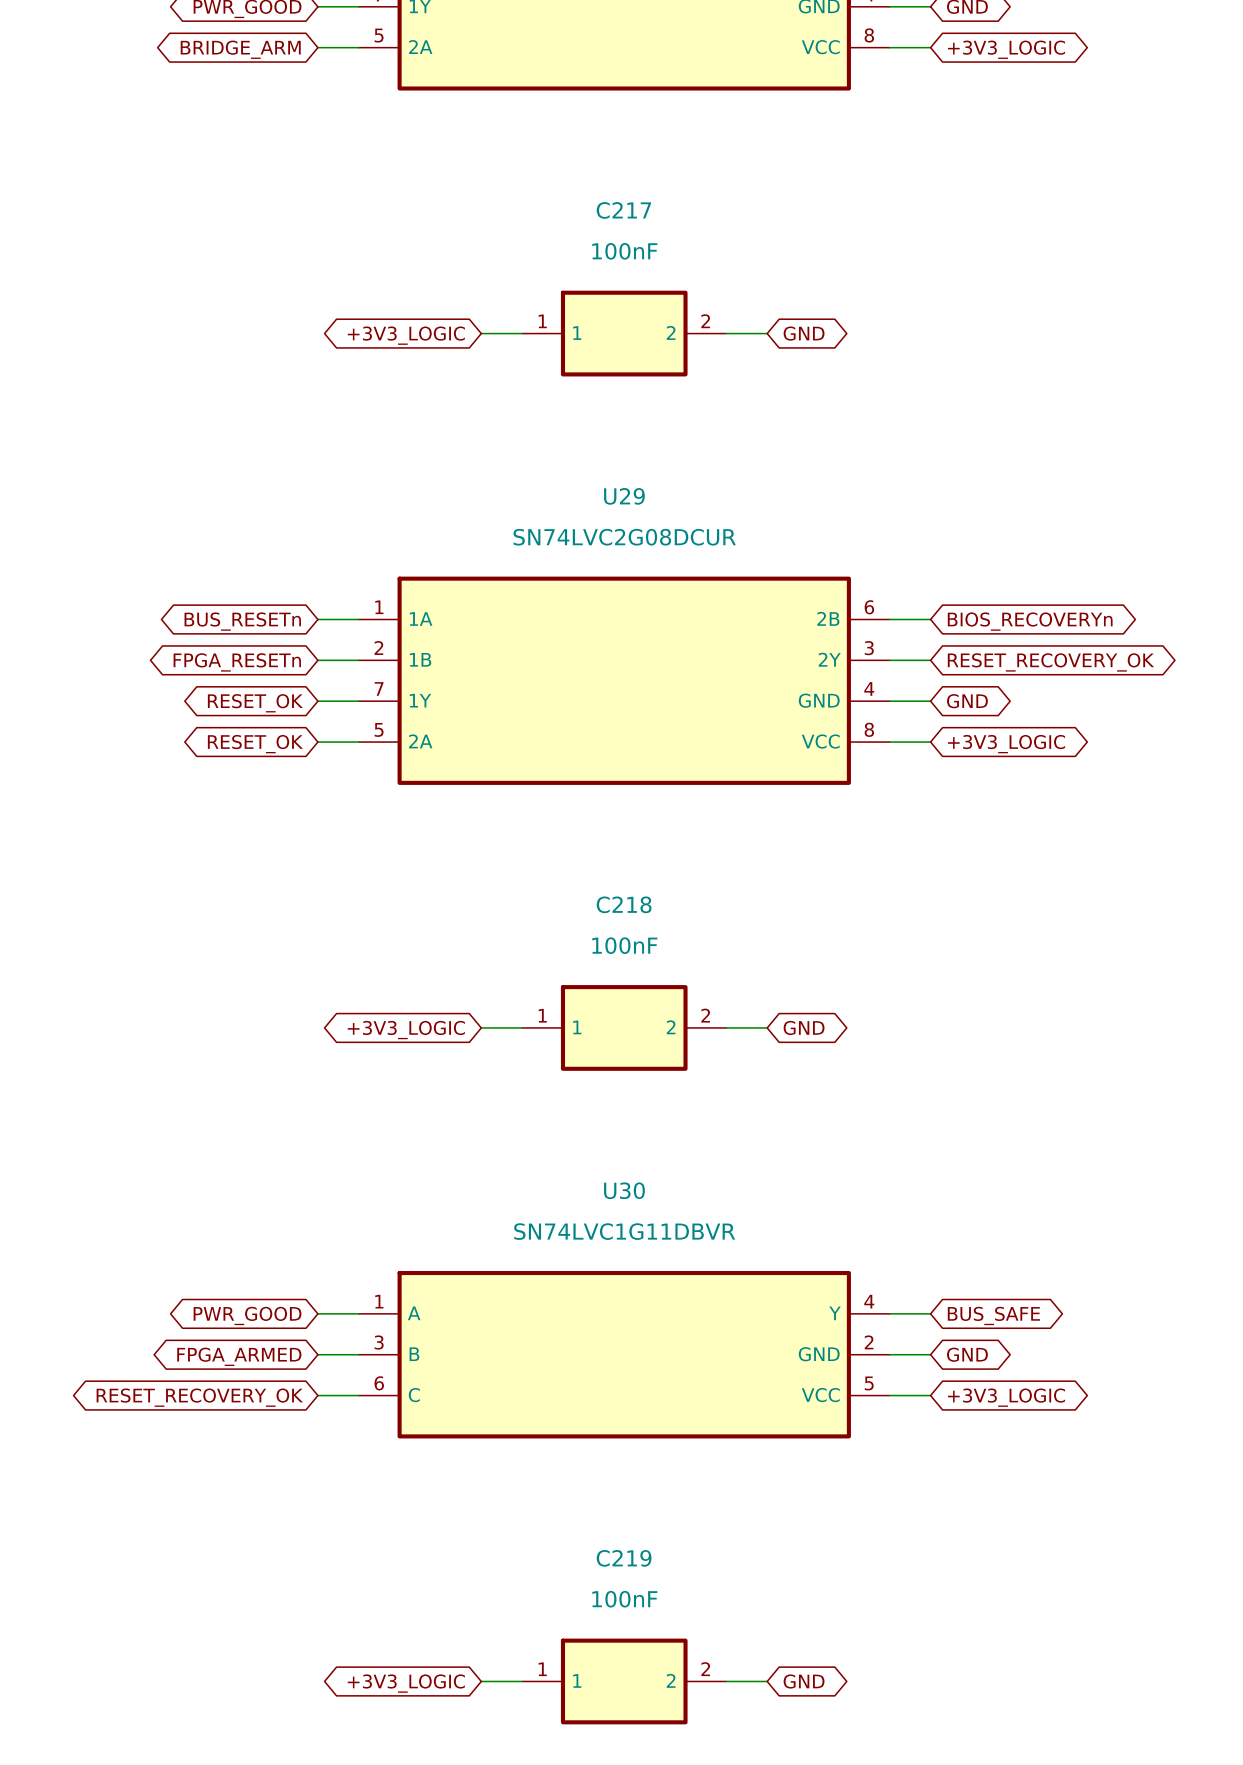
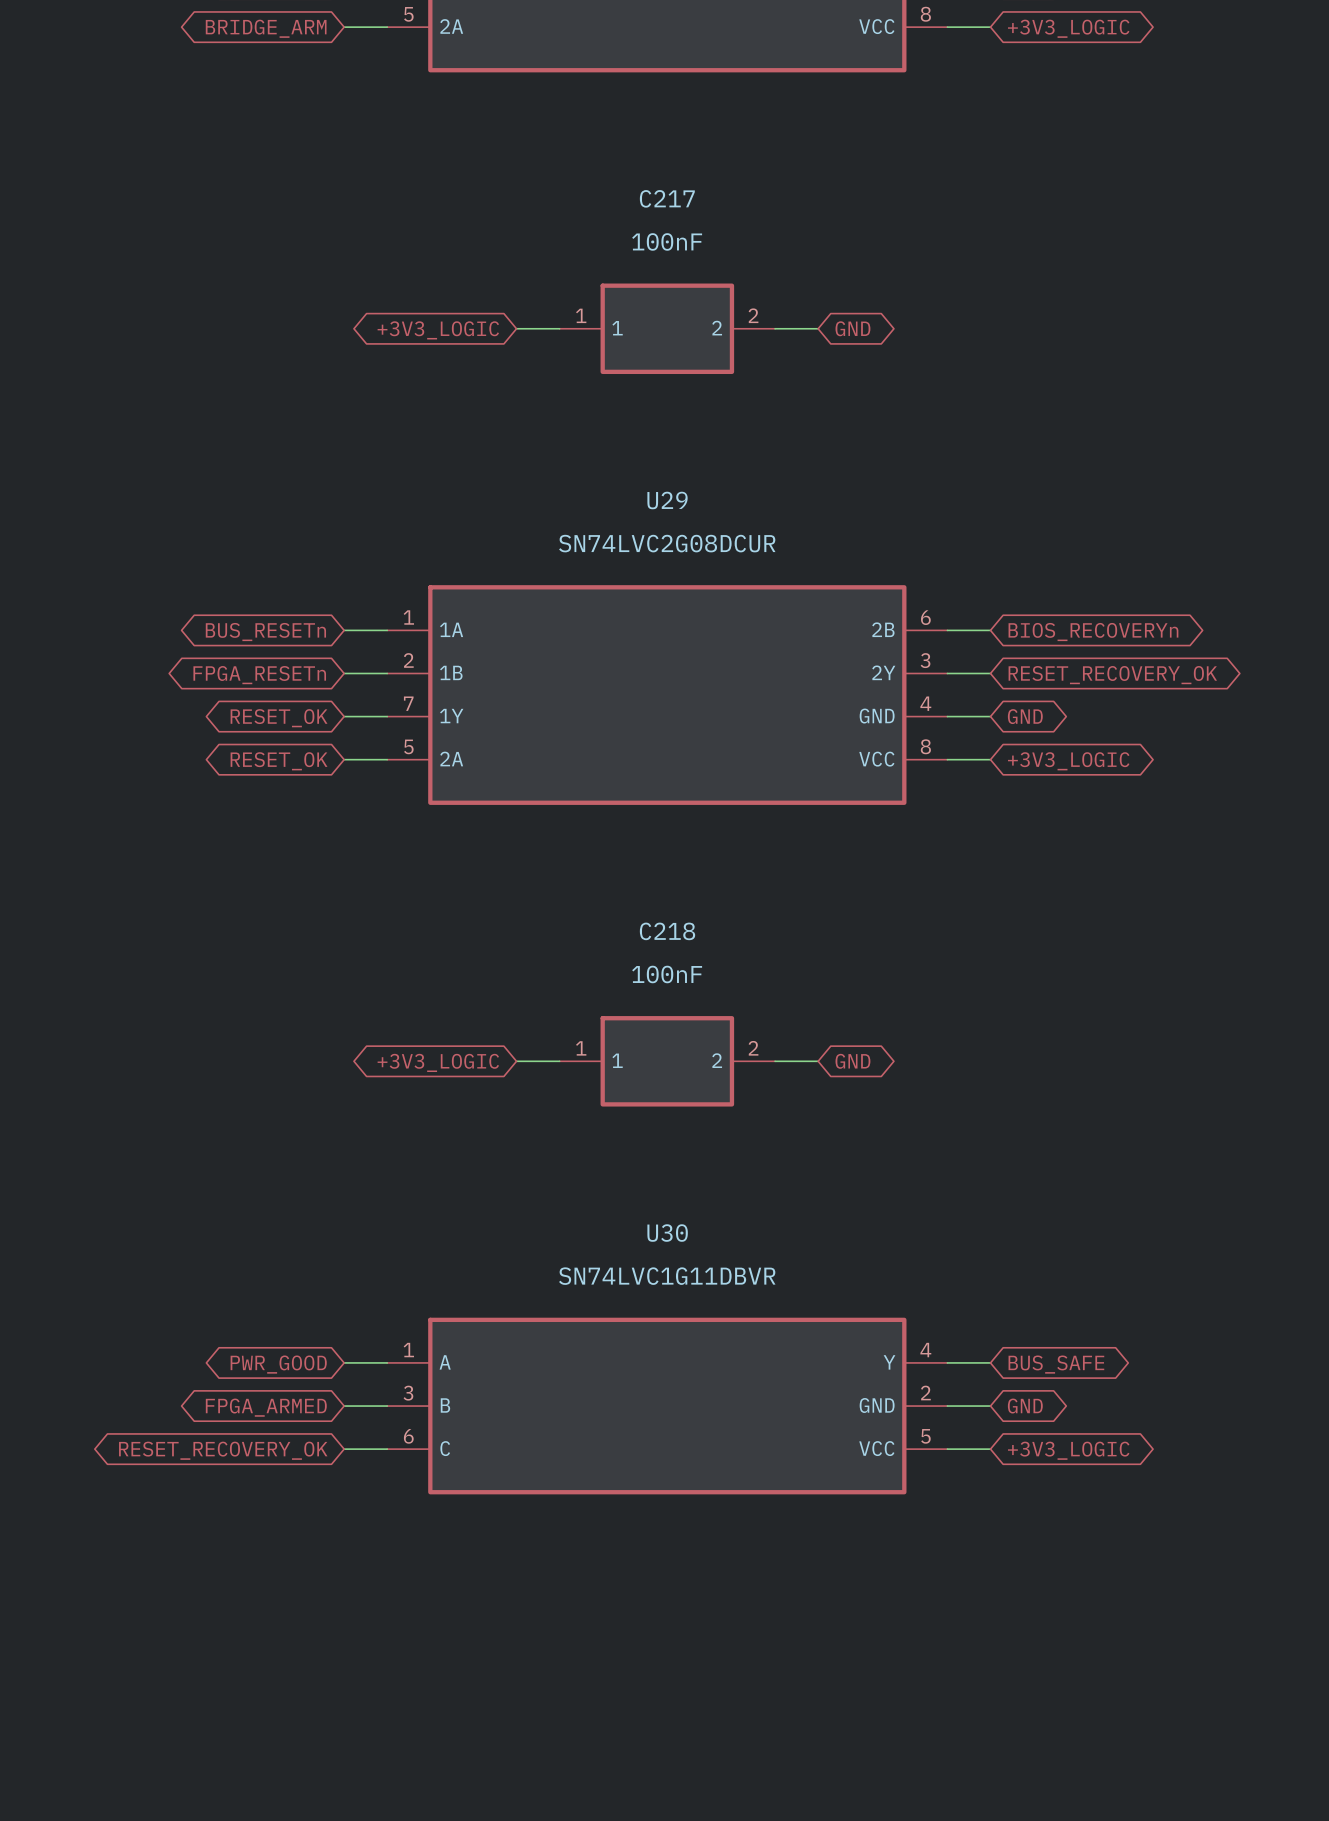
wire: (481, 1681) (522, 1681) -> none
C219: 100nF (624, 1681) -> none
wire: (726, 1681) (767, 1681) -> none
global label: GND (804, 1681) -> none
global label: +3V3_LOGIC (406, 1683) -> none

